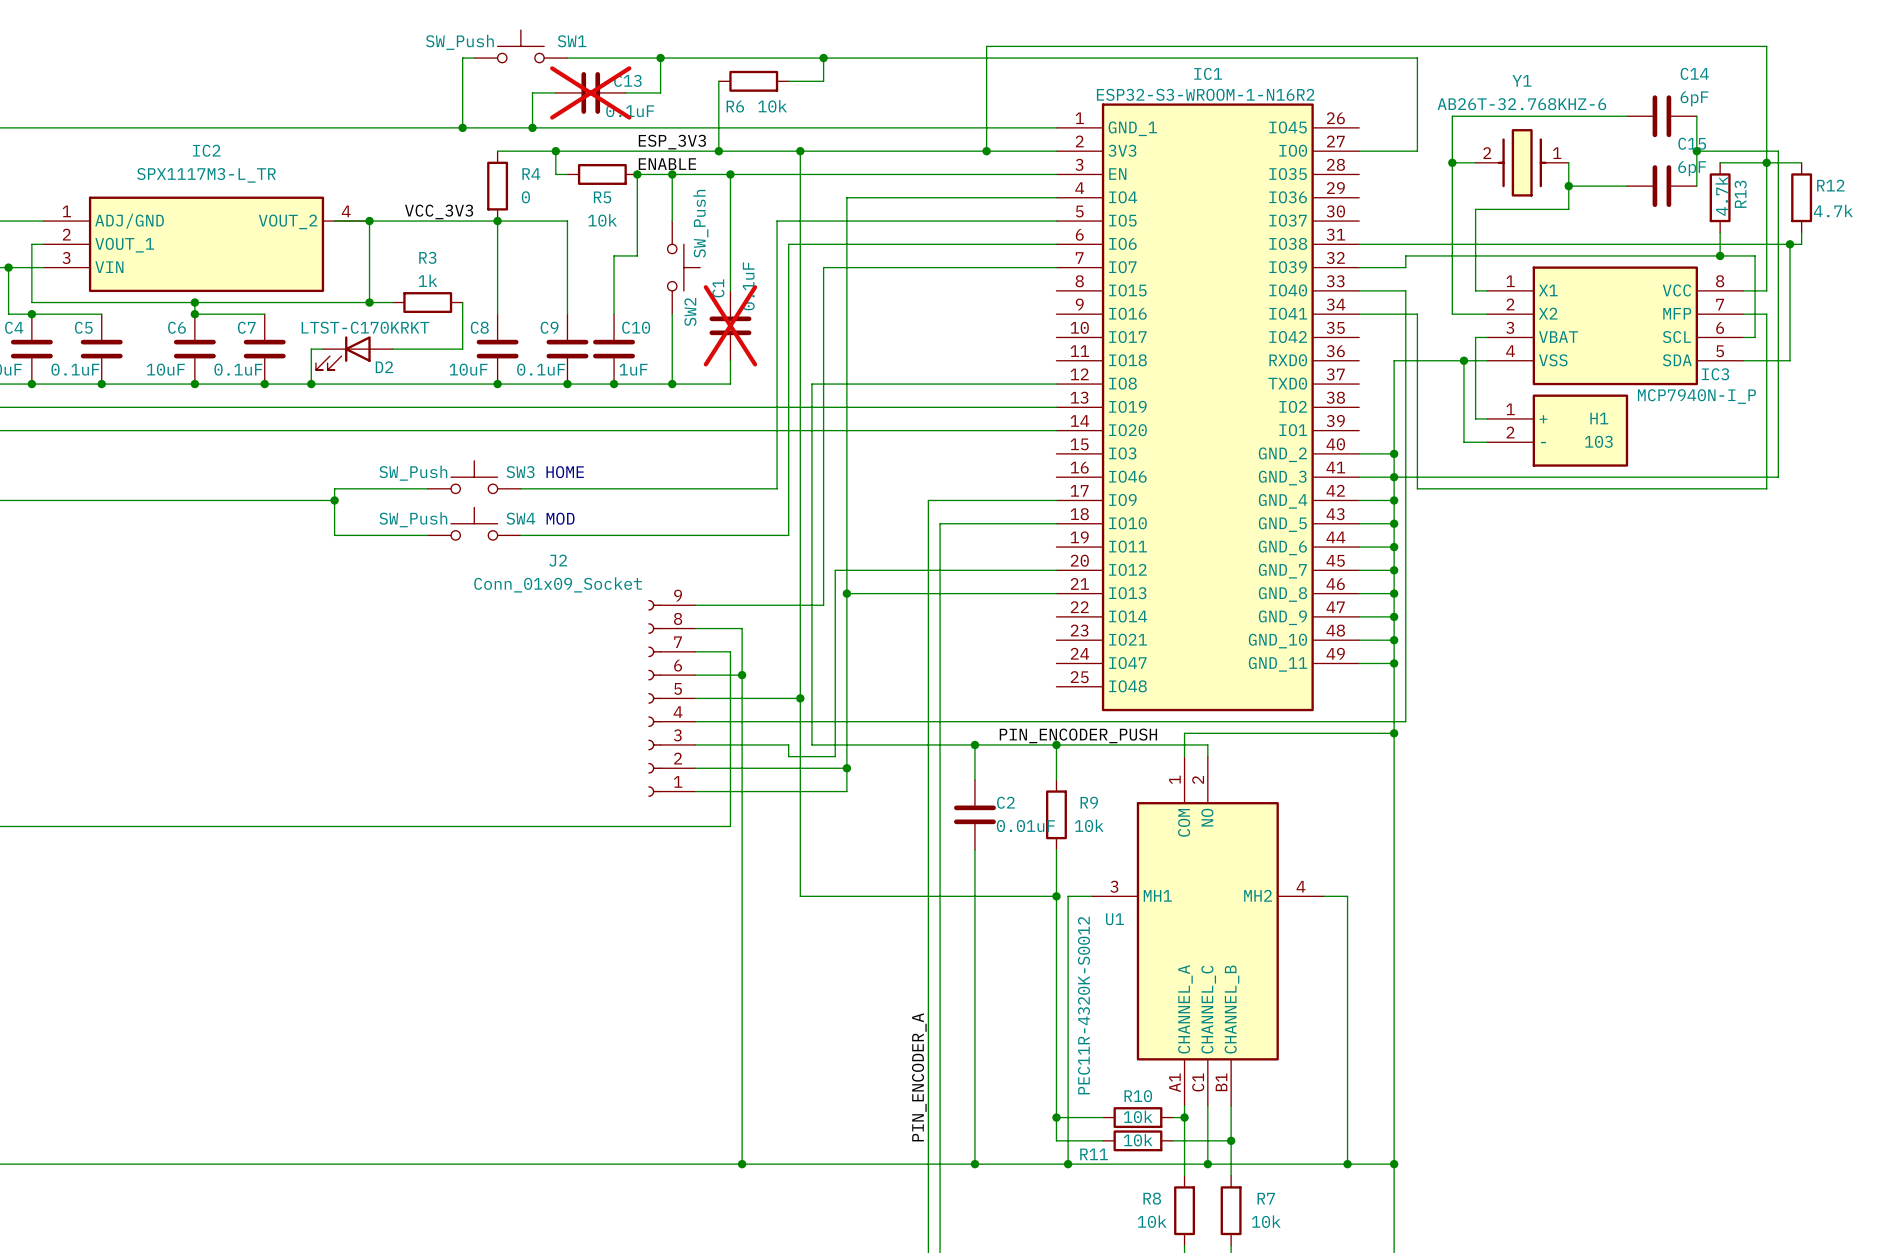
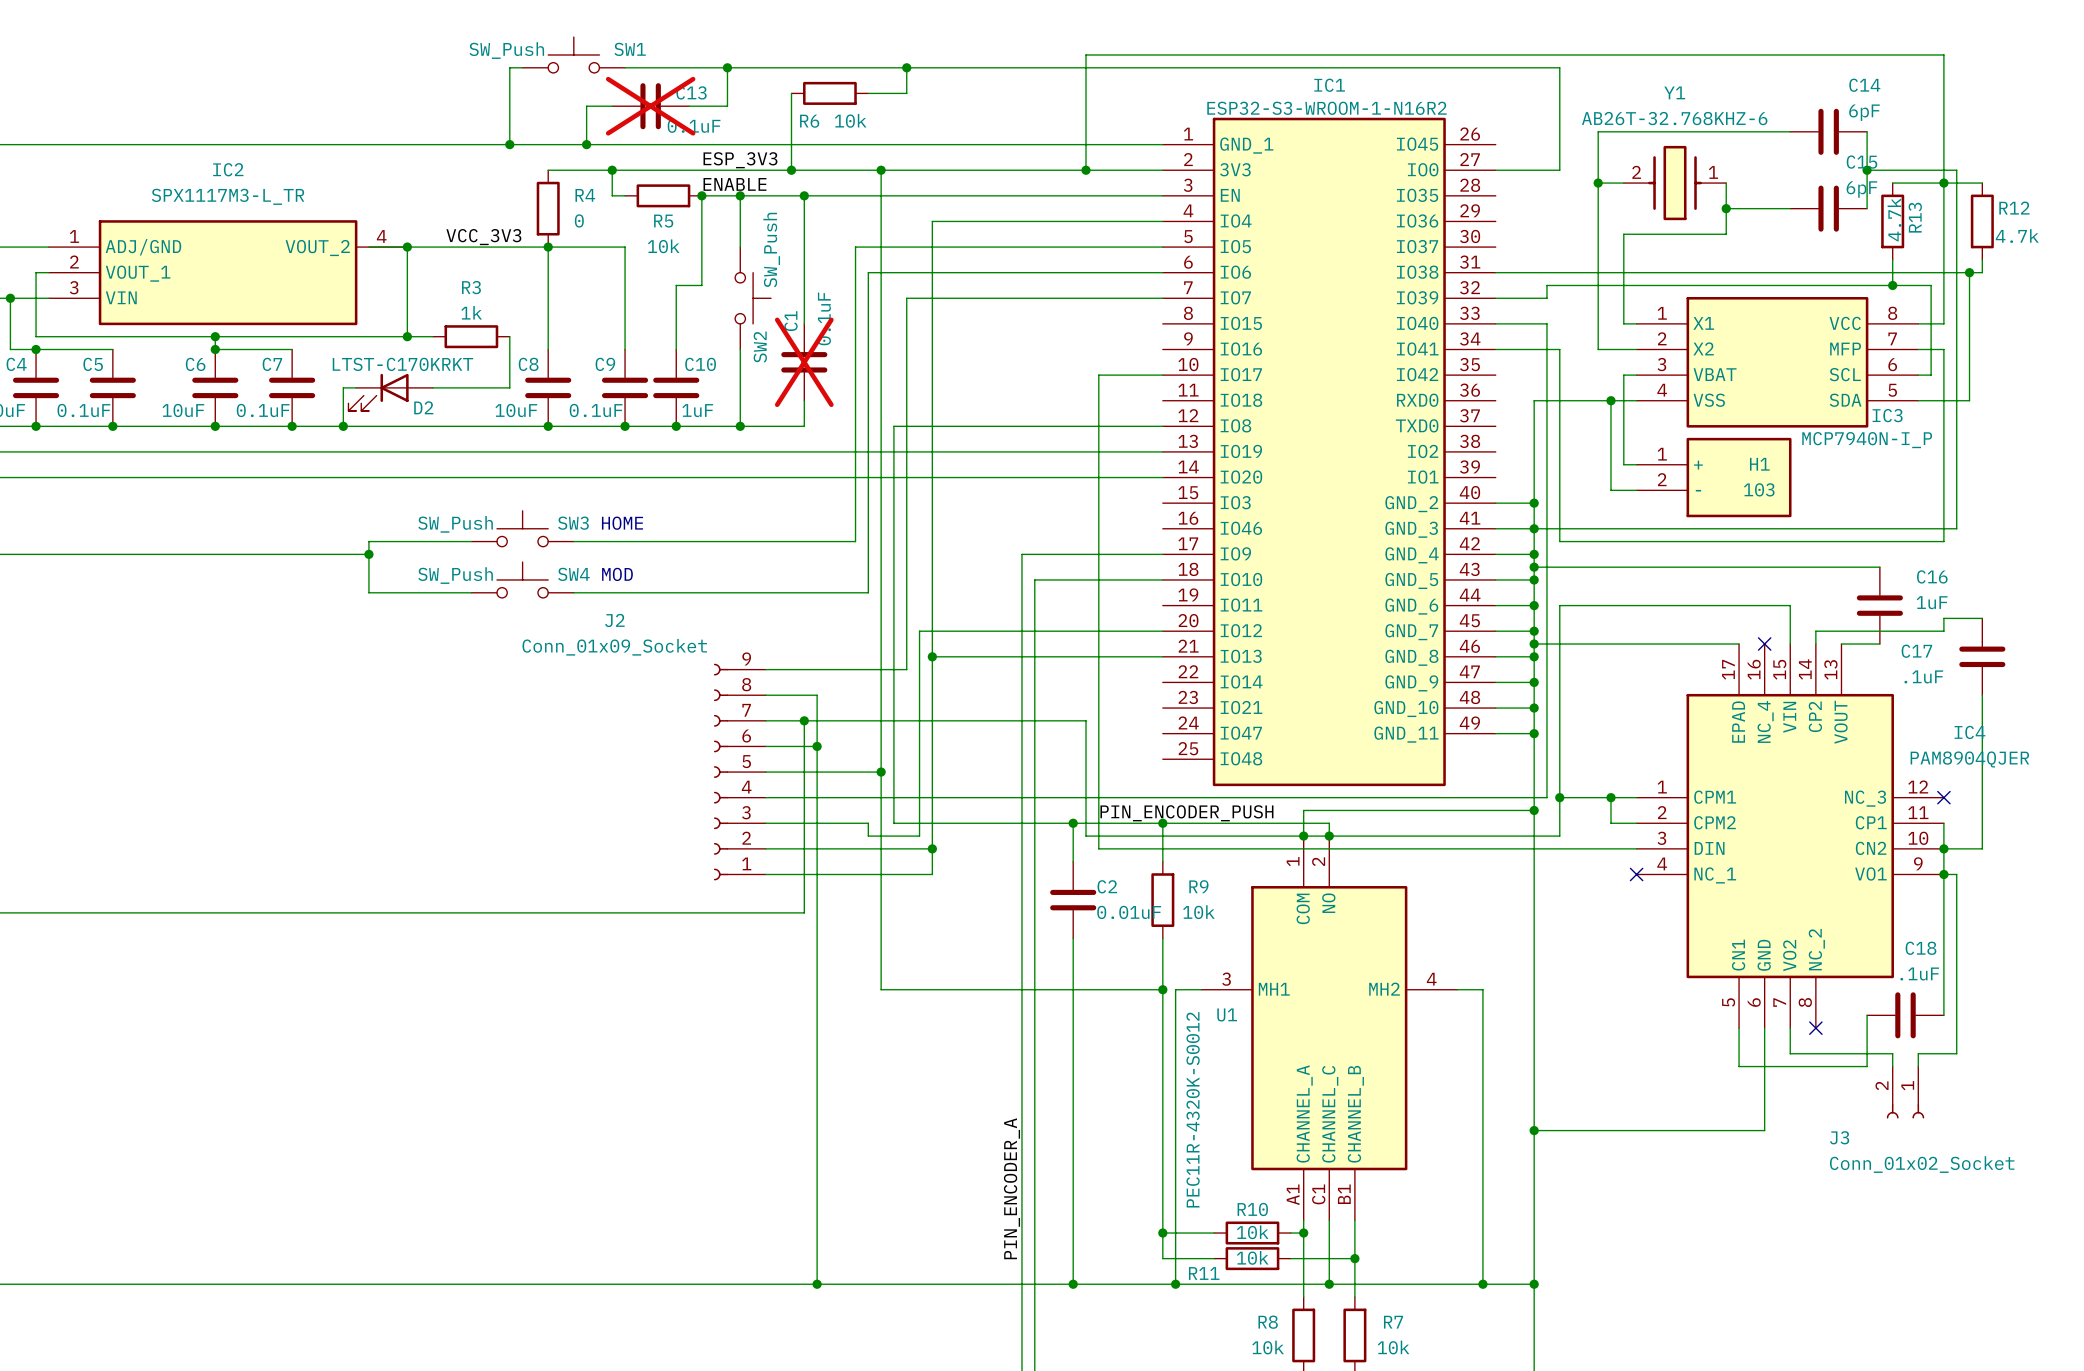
wire: none -> (1162, 375) (1098, 375) (1098, 848) (1636, 848)
wire: none -> (1534, 567) (1879, 567)
junction: none -> (1534, 567)
C16: none -> 1uF (1879, 605)
wire: none -> (1982, 618) (1943, 618) (1943, 631) (1815, 631) (1815, 644)
wire: none -> (1534, 644) (1739, 644)
junction: none -> (1534, 644)
no-connect mark: none -> (1764, 644)
wire: none -> (1790, 644) (1790, 605) (1559, 605) (1559, 836) (1086, 836) (1086, 720) (804, 720)
wire: none -> (1841, 644) (1879, 644)
C17: none -> .1uF (1982, 656)
wire: none -> (1982, 695) (1982, 848) (1943, 848)
junction: none -> (804, 720)
wire: none -> (1559, 797) (1636, 797)
junction: none -> (1559, 797)
wire: none -> (1610, 797) (1610, 823) (1636, 823)
junction: none -> (1610, 797)
no-connect mark: none -> (1943, 797)
wire: none -> (1943, 823) (1943, 1015)
junction: none -> (1303, 836)
junction: none -> (1329, 836)
IC4: none -> PAM8904QJER (1790, 836)
junction: none -> (1943, 848)
no-connect mark: none -> (1636, 874)
wire: none -> (1943, 874) (1956, 874) (1956, 1053) (1918, 1053) (1918, 1066)
junction: none -> (1943, 874)
wire: none -> (1867, 1015) (1867, 1066) (1739, 1066) (1739, 1028)
C18: none -> .1uF (1905, 1015)
wire: none -> (1764, 1028) (1764, 1130) (1534, 1130)
wire: none -> (1790, 1028) (1790, 1053) (1892, 1053) (1892, 1066)
no-connect mark: none -> (1815, 1028)
J3: none -> Conn_01x02_Socket (1905, 1092)
junction: none -> (1534, 1130)

